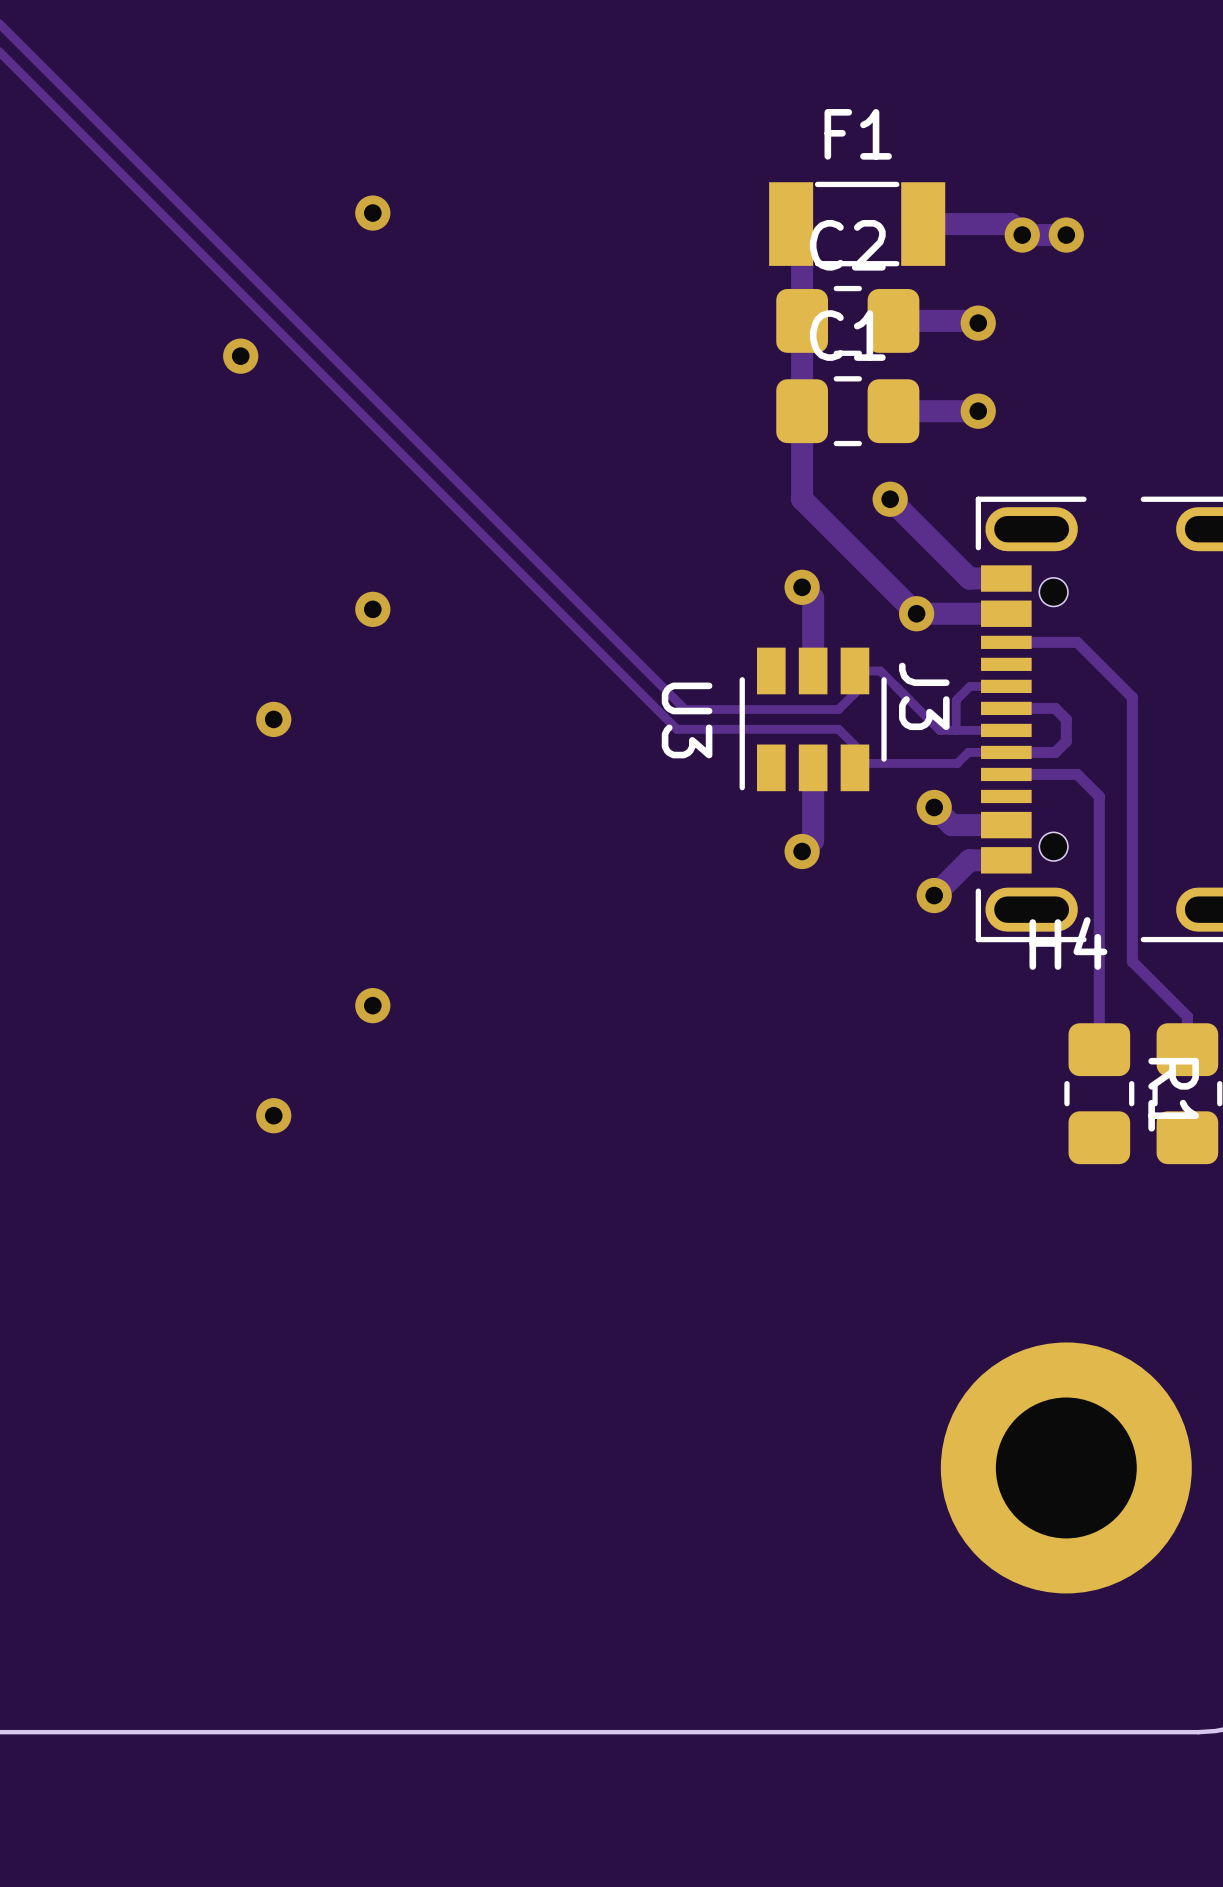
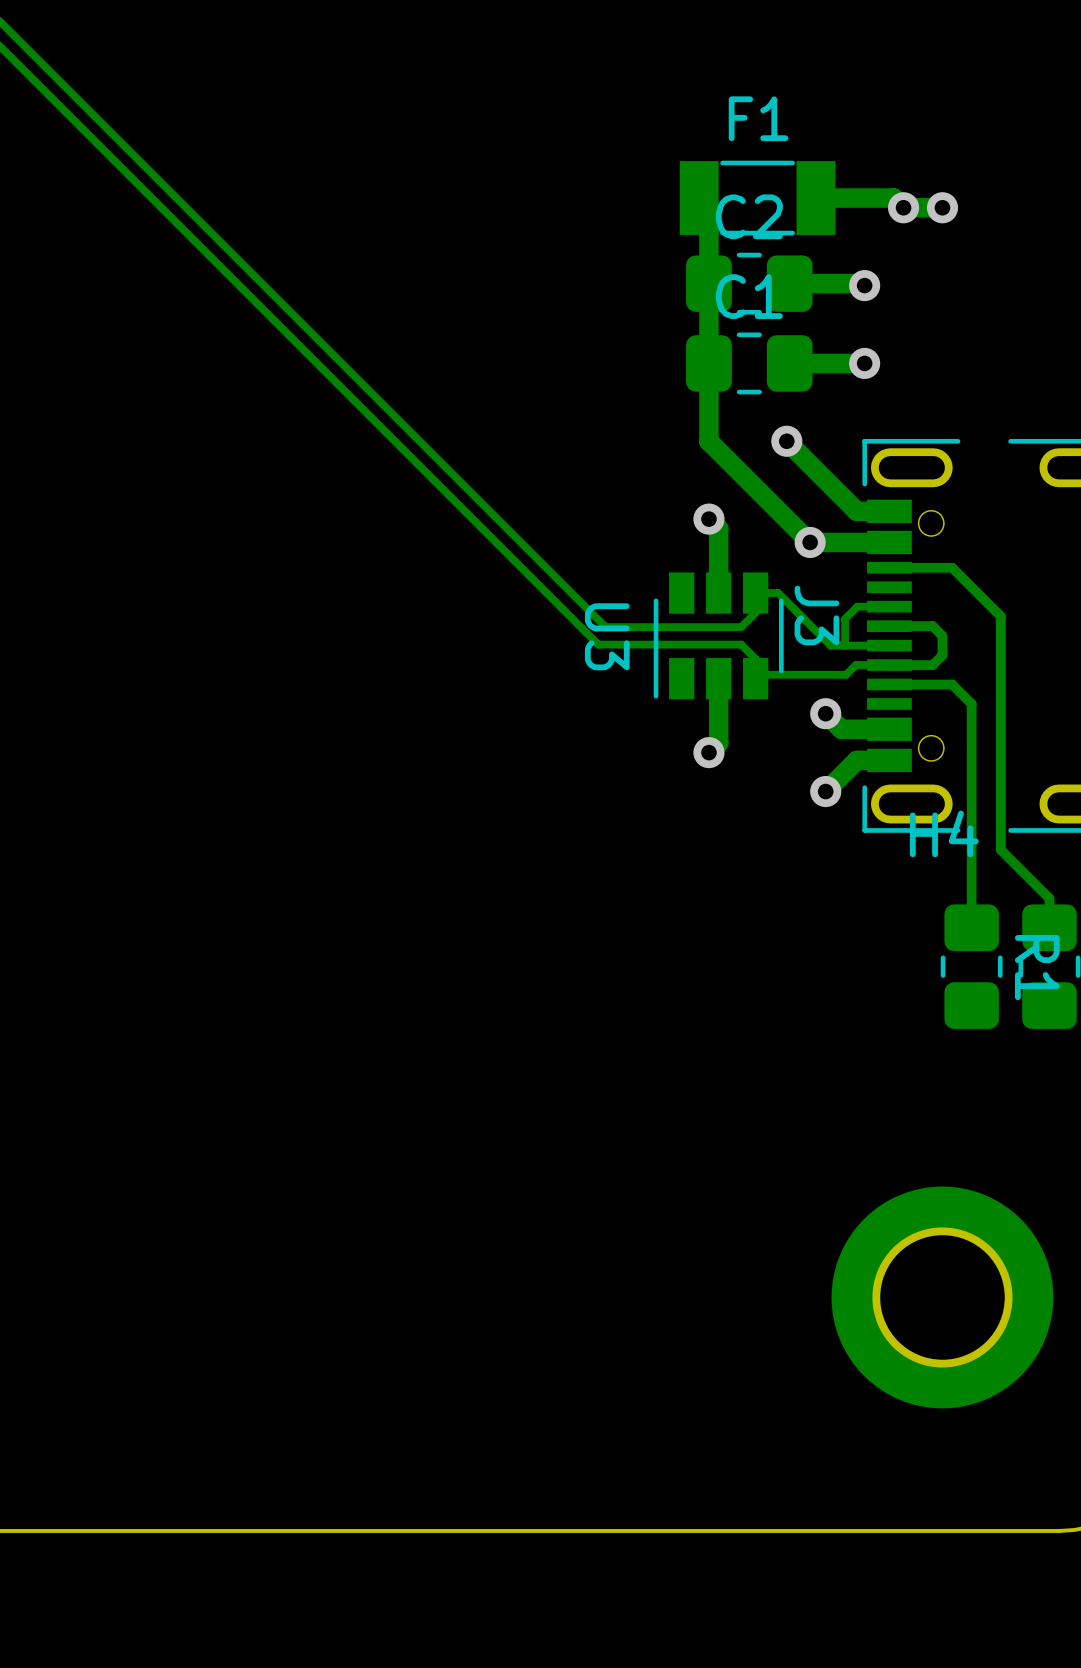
via: (372, 213) -> none
via: (240, 356) -> none
via: (372, 609) -> none
via: (273, 719) -> none
via: (372, 1005) -> none
via: (273, 1115) -> none

